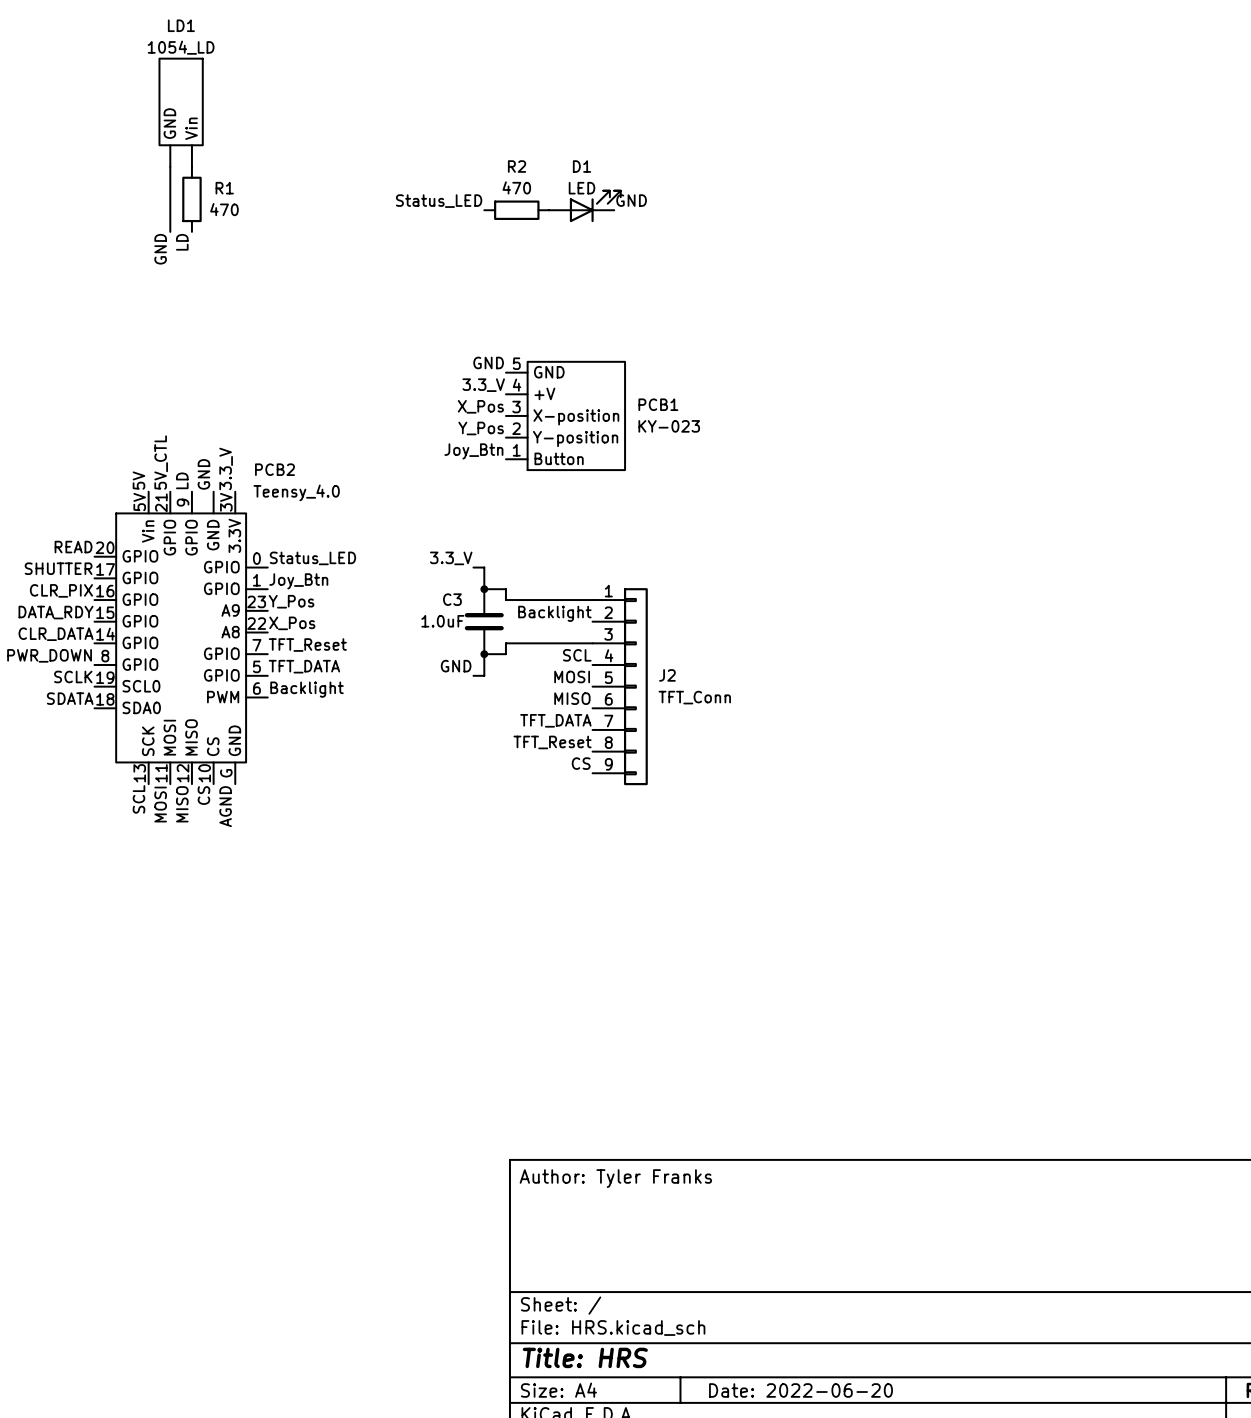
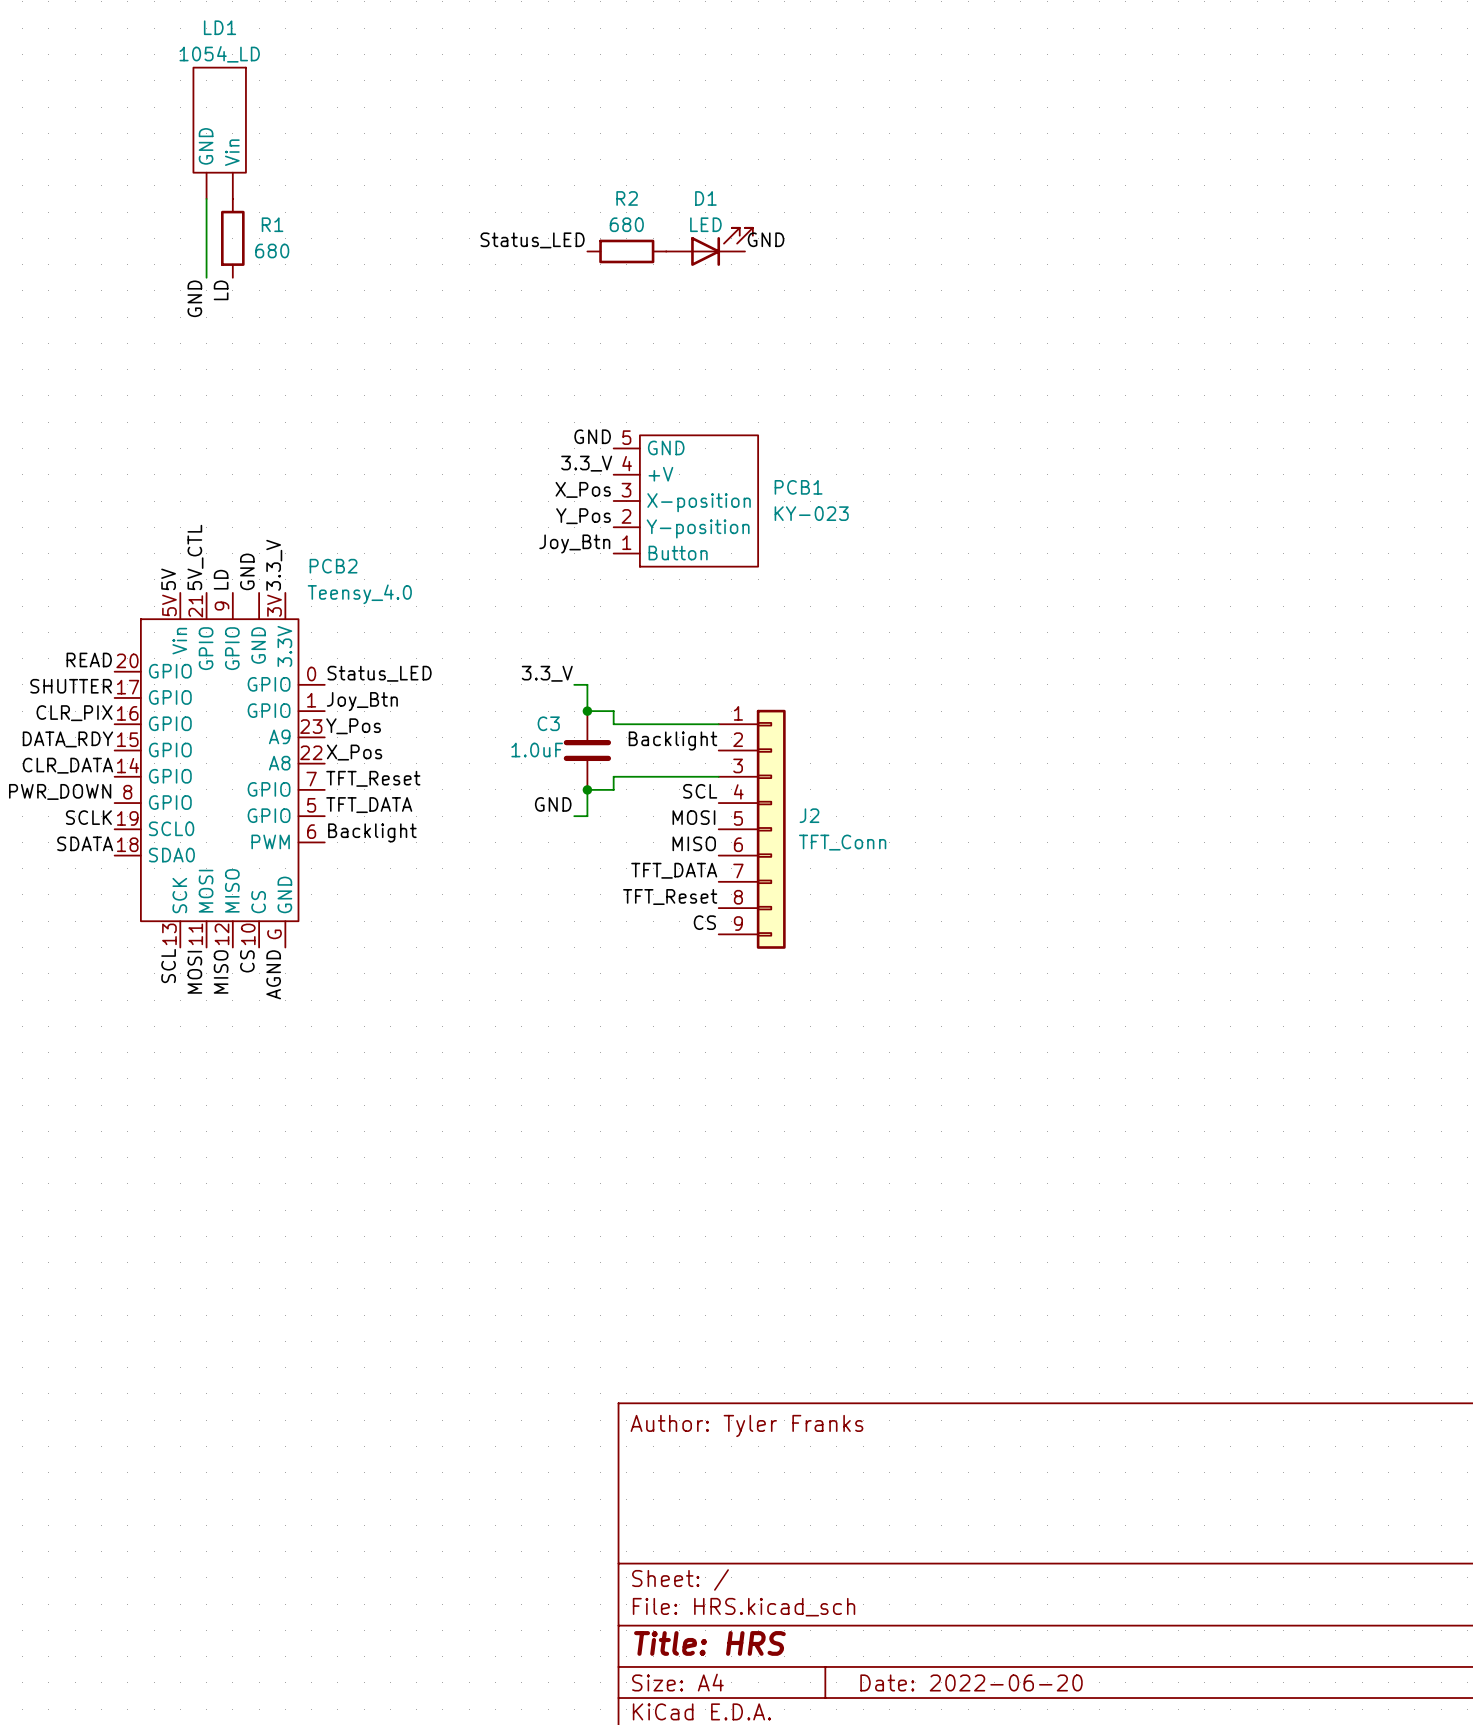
R2 value: 470 (516, 187) -> 680 (626, 224)
R1 value: 470 (224, 209) -> 680 (272, 250)

